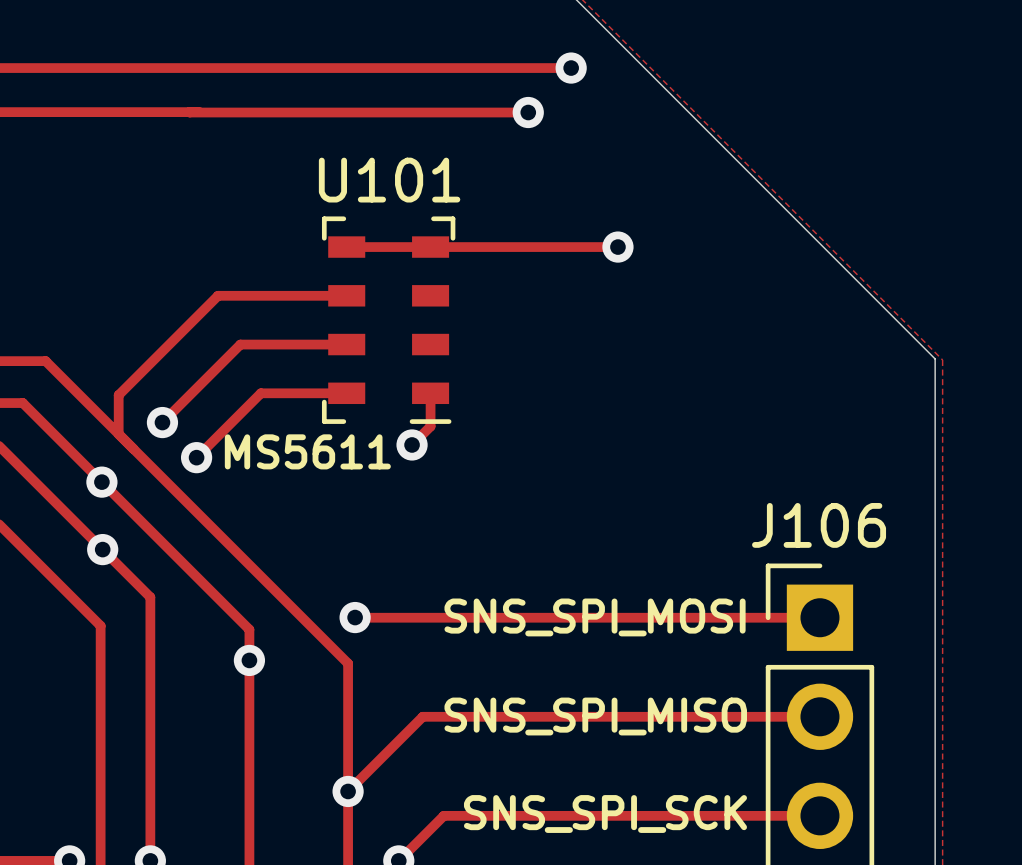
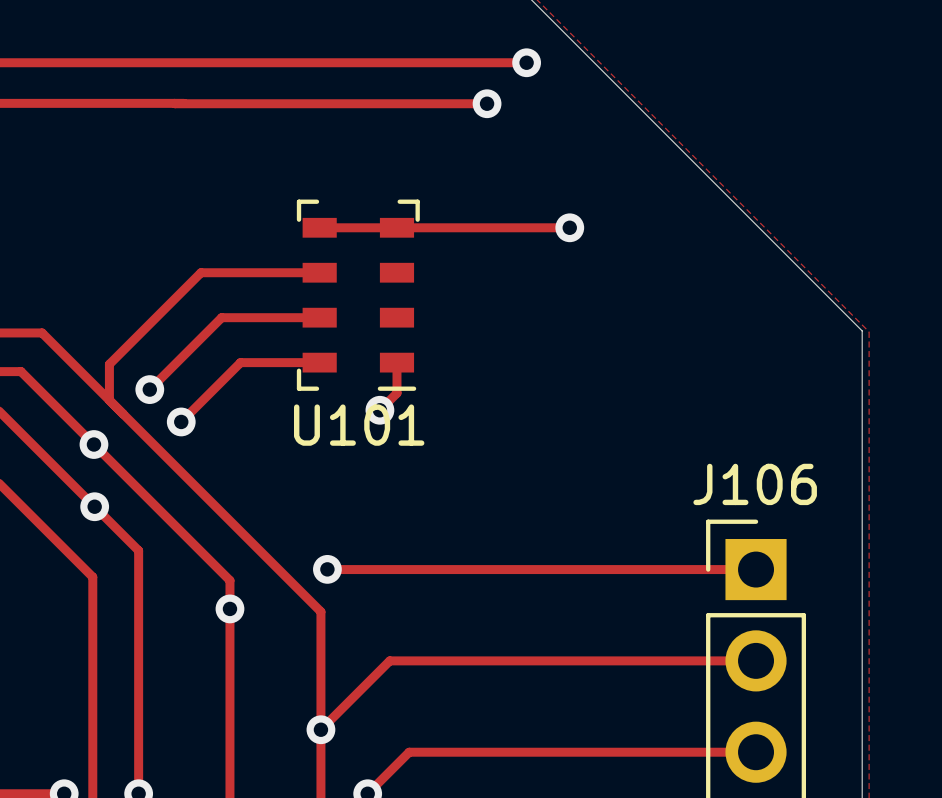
U101 name position: U101 (389, 180) -> U101 (359, 425)
text: MS5611 (307, 451) -> none
text: SNS_SPI_MOSI (595, 617) -> none
text: SNS_SPI_MISO (595, 716) -> none
text: SNS_SPI_SCK (605, 814) -> none

